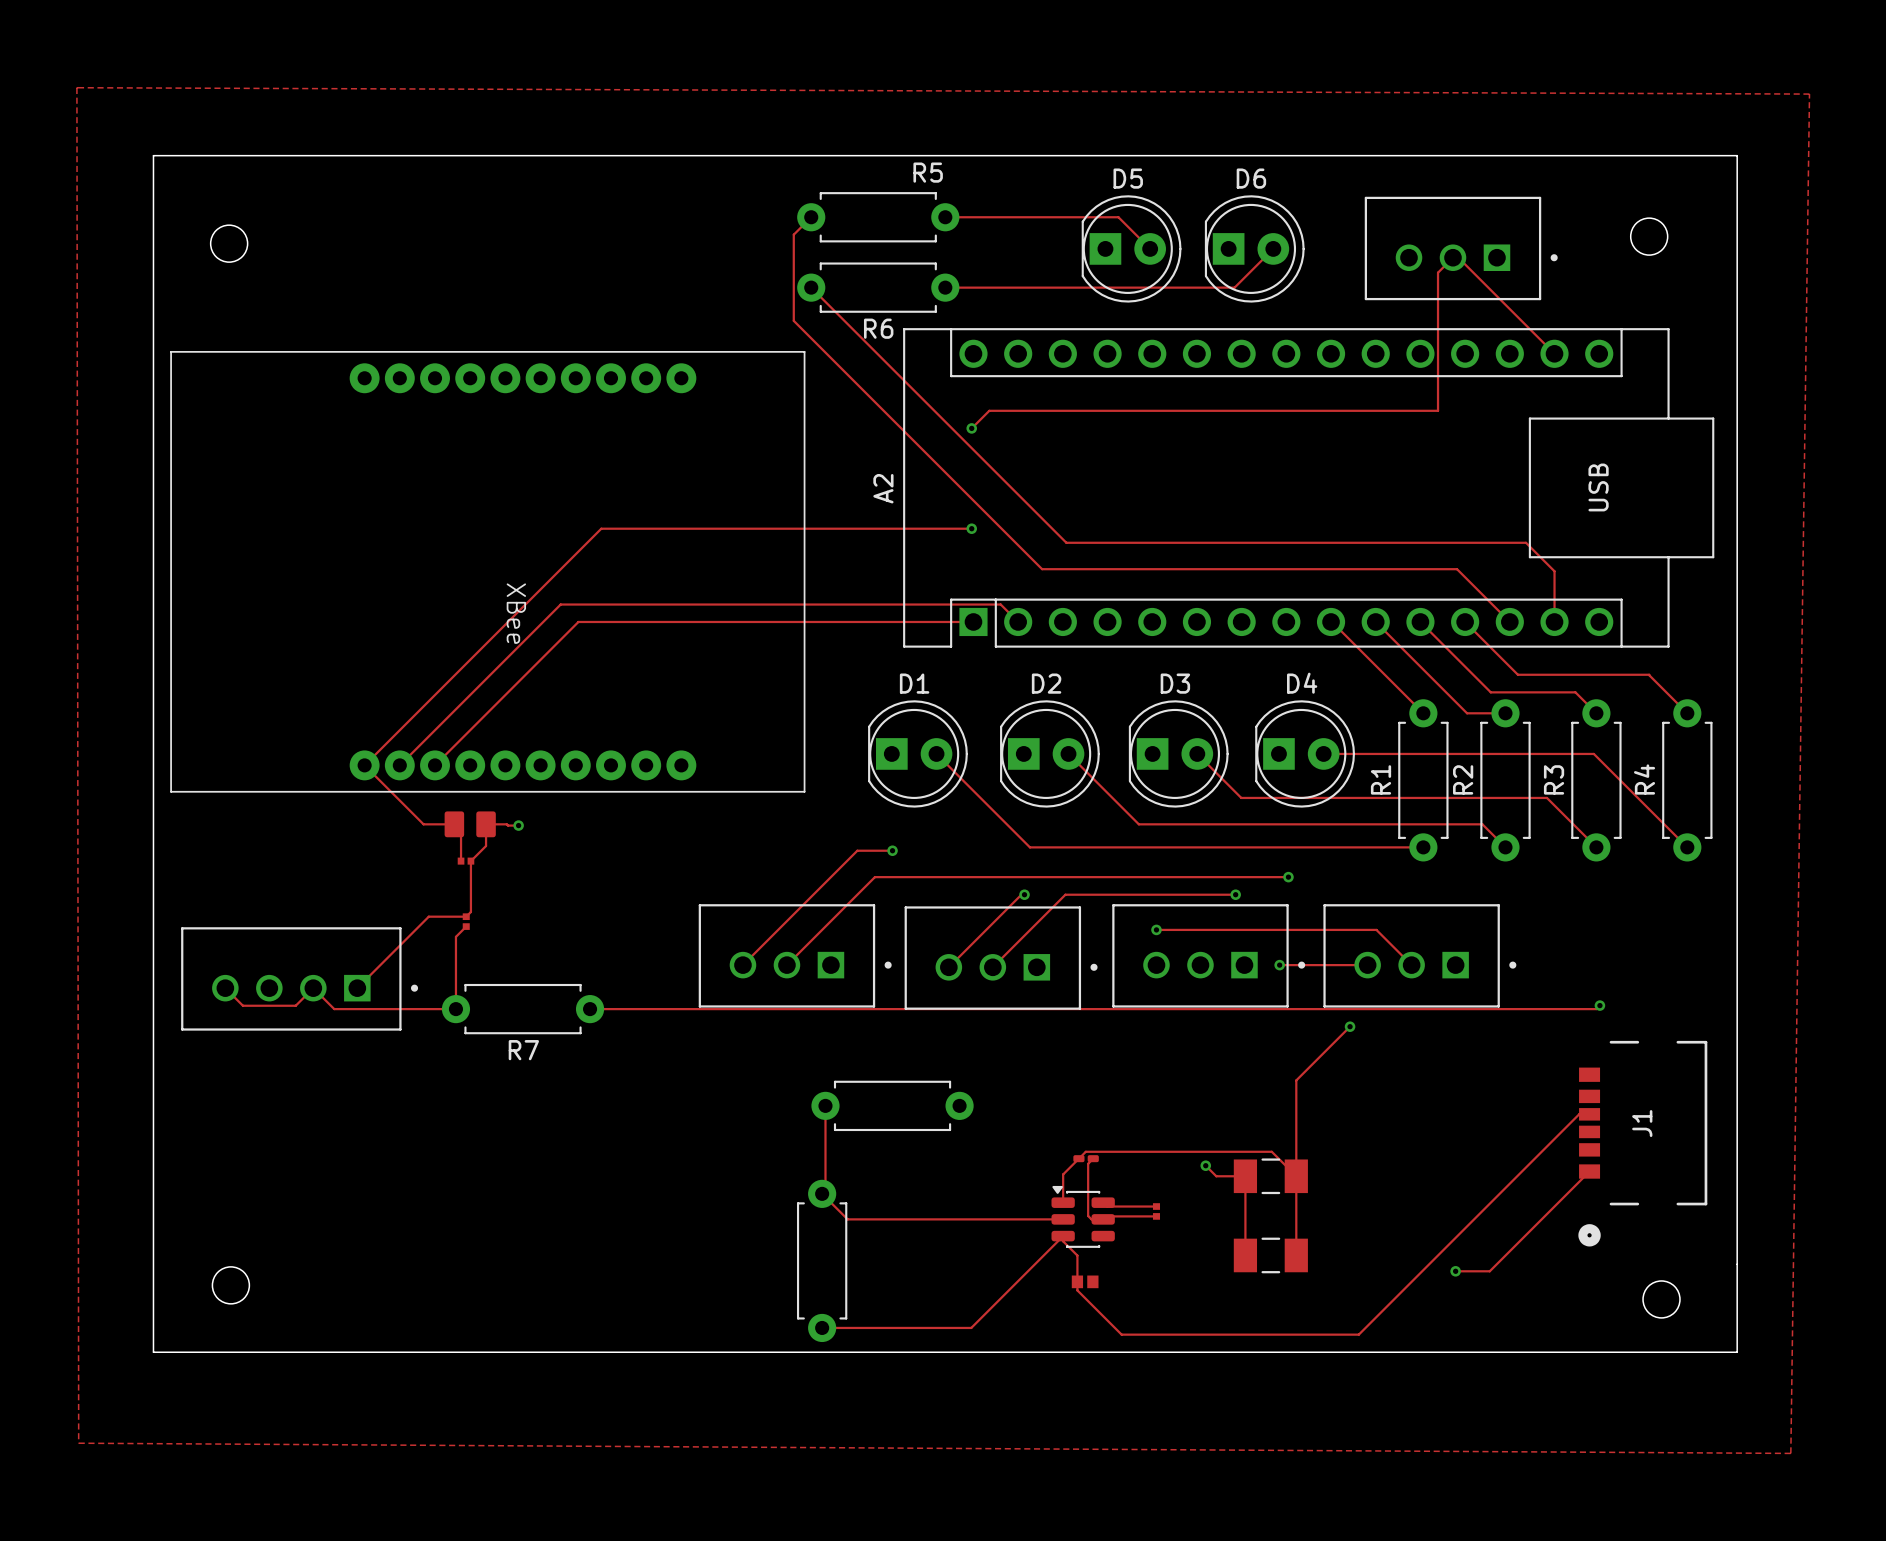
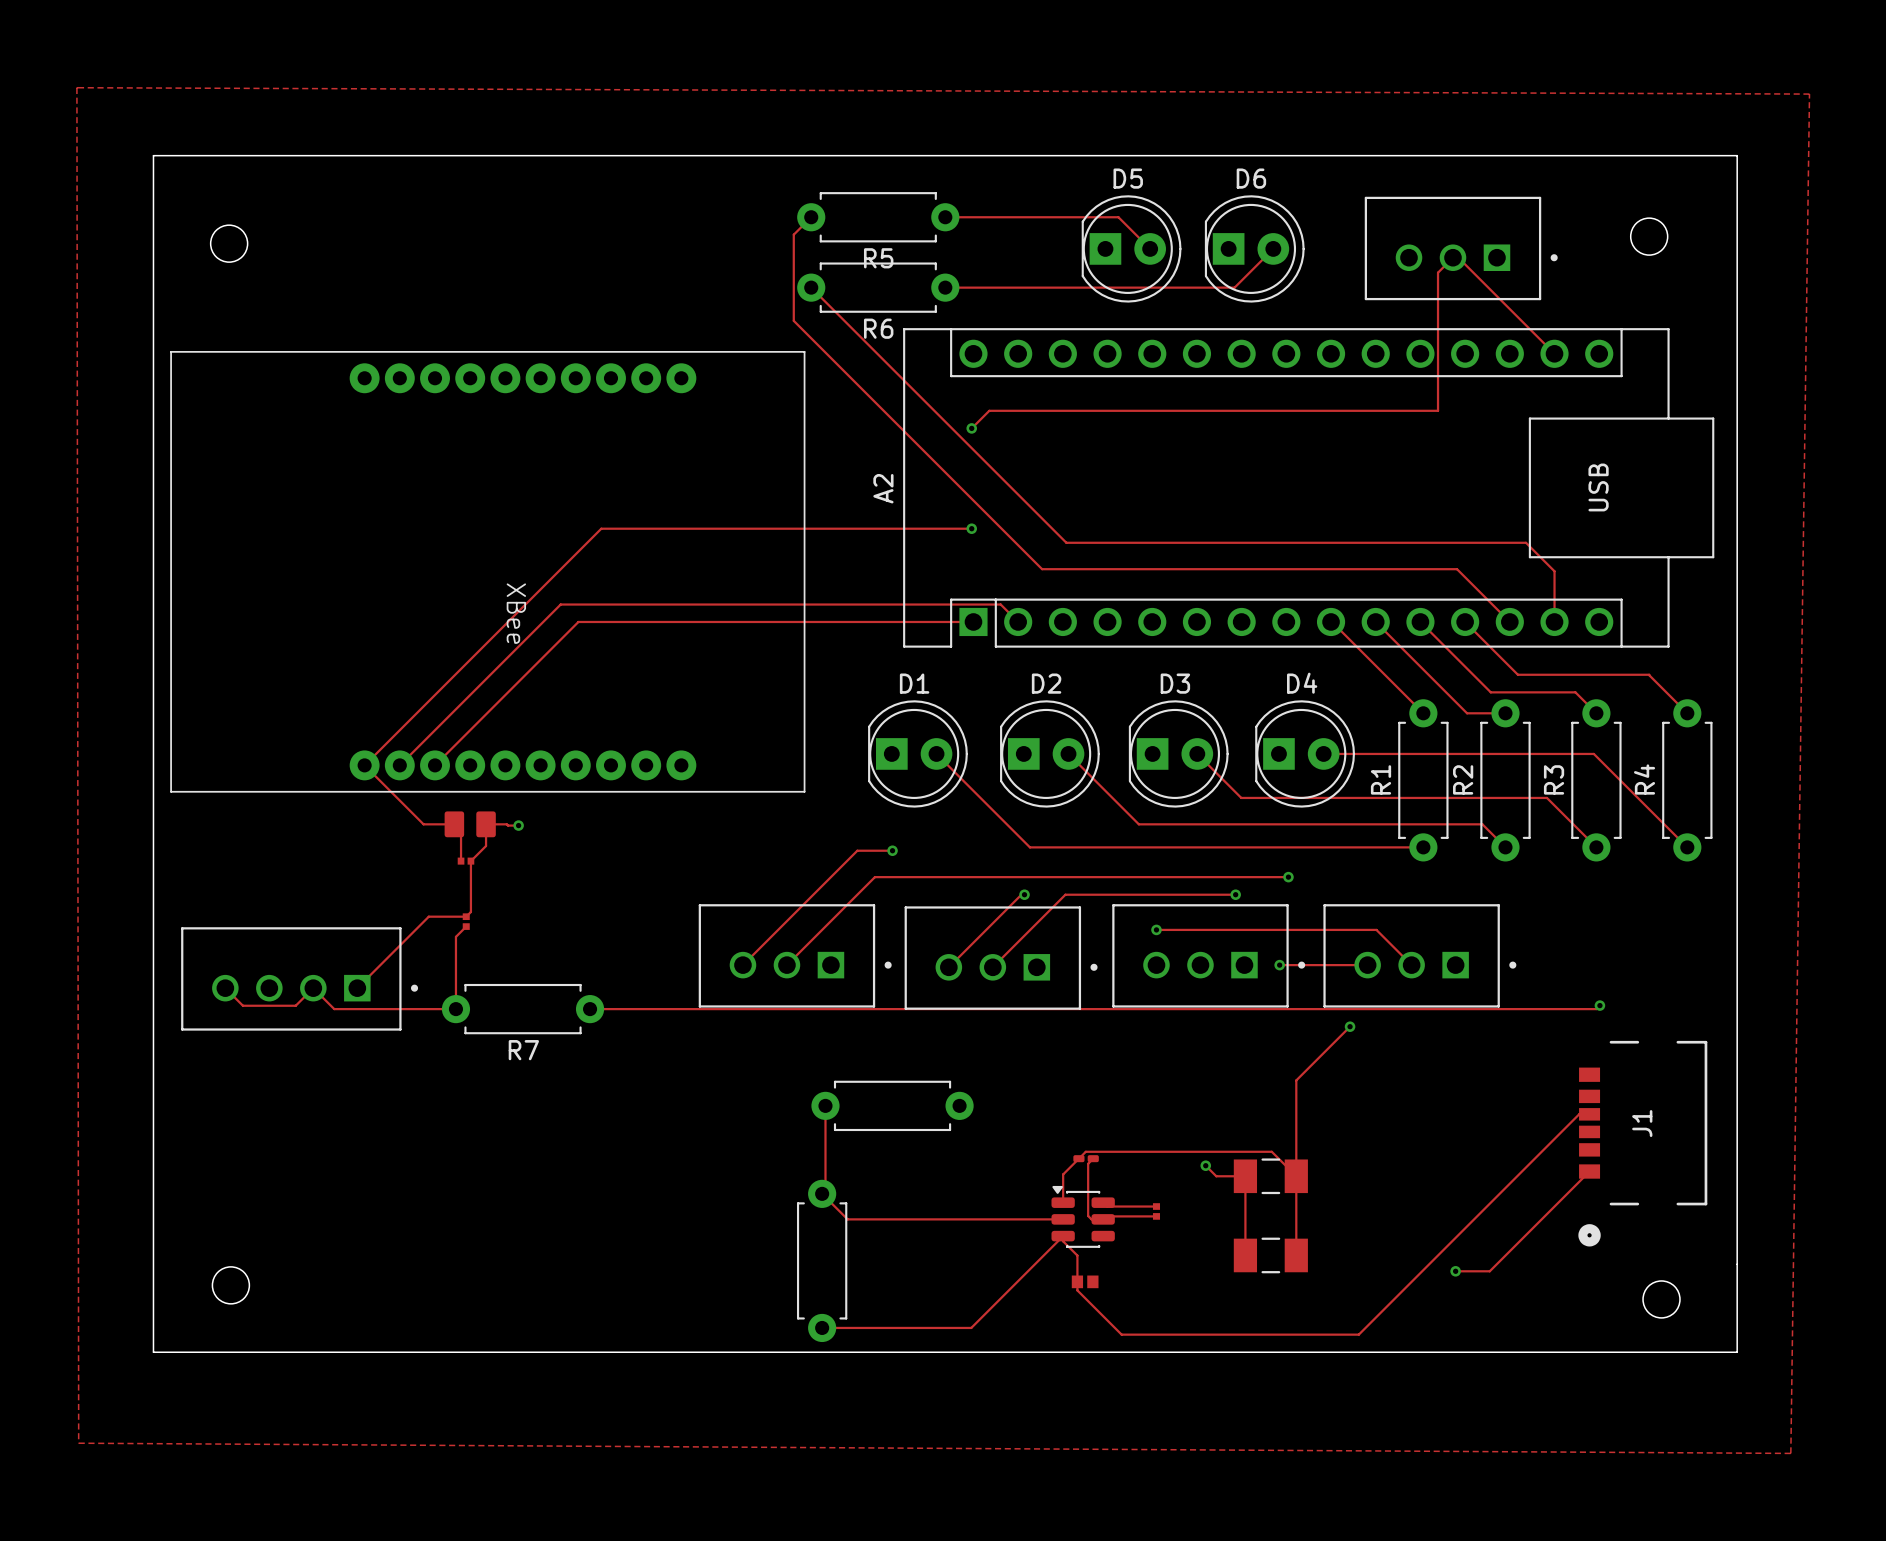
R5 name position: R5 (928, 172) -> R5 (878, 258)

